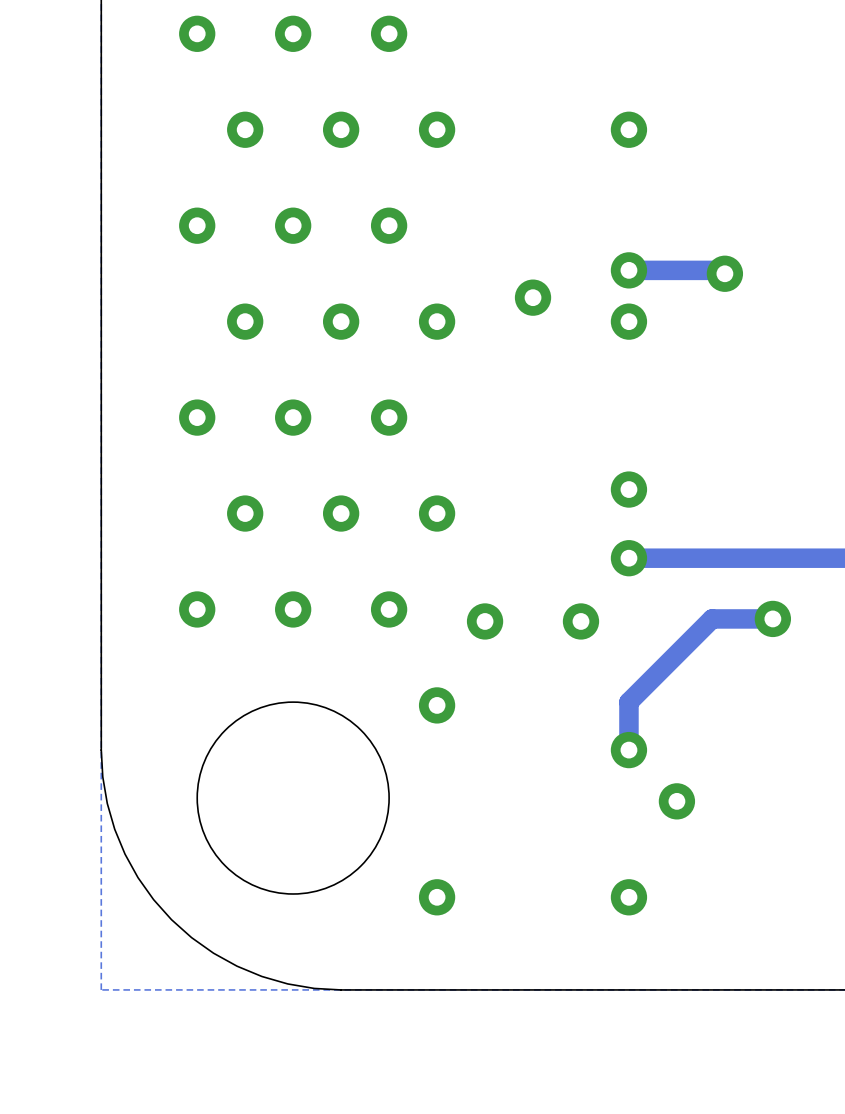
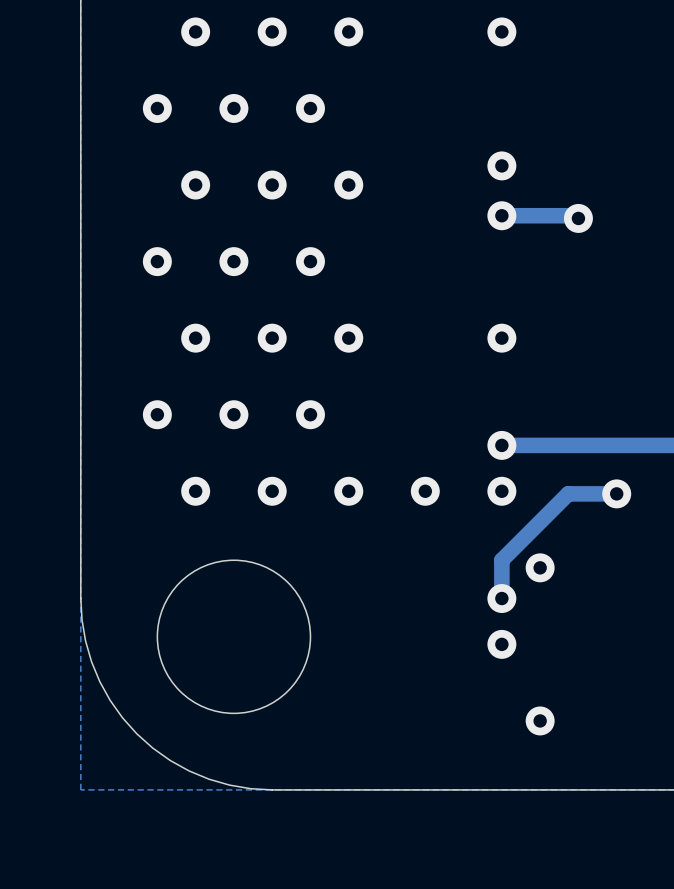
via: (197, 33) -> none
via: (293, 33) -> none
via: (389, 33) -> none
via: none -> (195, 31)
via: none -> (272, 31)
via: none -> (348, 31)
via: none -> (501, 31)
via: (245, 129) -> none
via: (341, 129) -> none
via: (437, 129) -> none
via: (628, 129) -> none
via: none -> (157, 108)
via: none -> (233, 108)
via: none -> (310, 108)
via: none -> (501, 165)
via: (197, 225) -> none
via: (293, 225) -> none
via: (389, 225) -> none
via: none -> (195, 185)
via: none -> (272, 185)
via: none -> (348, 185)
via: (533, 297) -> none
via: (245, 321) -> none
via: (341, 321) -> none
via: (437, 321) -> none
via: (628, 321) -> none
via: none -> (157, 261)
via: none -> (233, 261)
via: none -> (310, 261)
via: (197, 417) -> none
via: (293, 417) -> none
via: (389, 417) -> none
via: none -> (195, 338)
via: none -> (272, 338)
via: none -> (348, 338)
via: none -> (501, 338)
via: (628, 489) -> none
via: (245, 513) -> none
via: (341, 513) -> none
via: (437, 513) -> none
via: none -> (157, 414)
via: none -> (233, 414)
via: none -> (310, 414)
via: (197, 609) -> none
via: (293, 609) -> none
via: (389, 609) -> none
via: none -> (195, 491)
via: none -> (272, 491)
via: none -> (348, 491)
via: none -> (425, 491)
via: none -> (501, 491)
via: (485, 621) -> none
via: (580, 621) -> none
via: (437, 705) -> none
via: none -> (540, 567)
via: (676, 801) -> none
via: none -> (501, 644)
via: (437, 897) -> none
via: (628, 897) -> none
via: none -> (540, 720)

